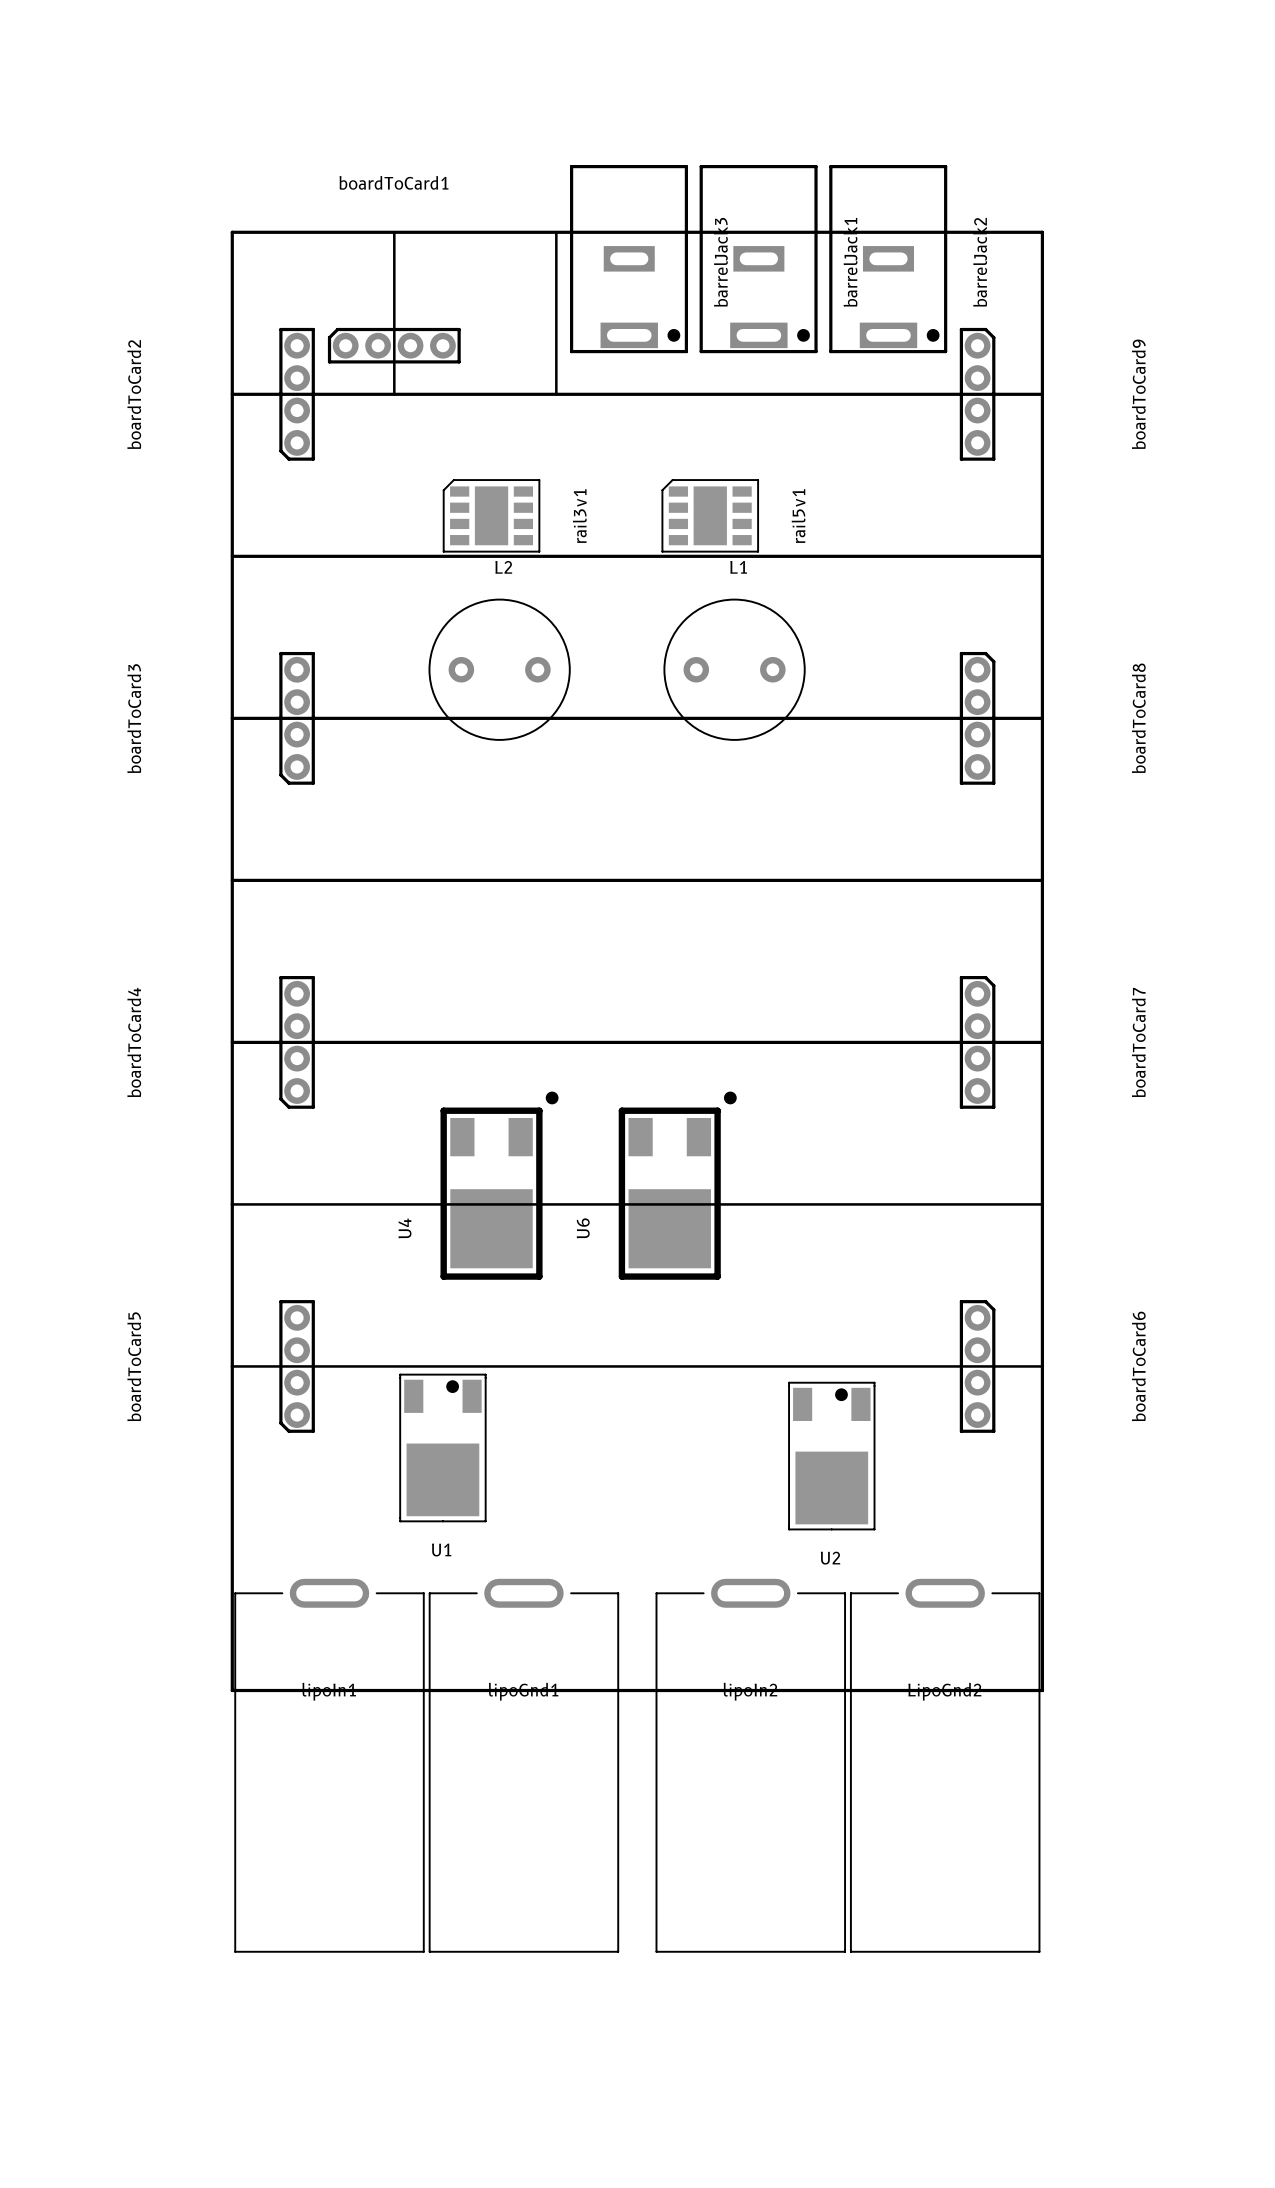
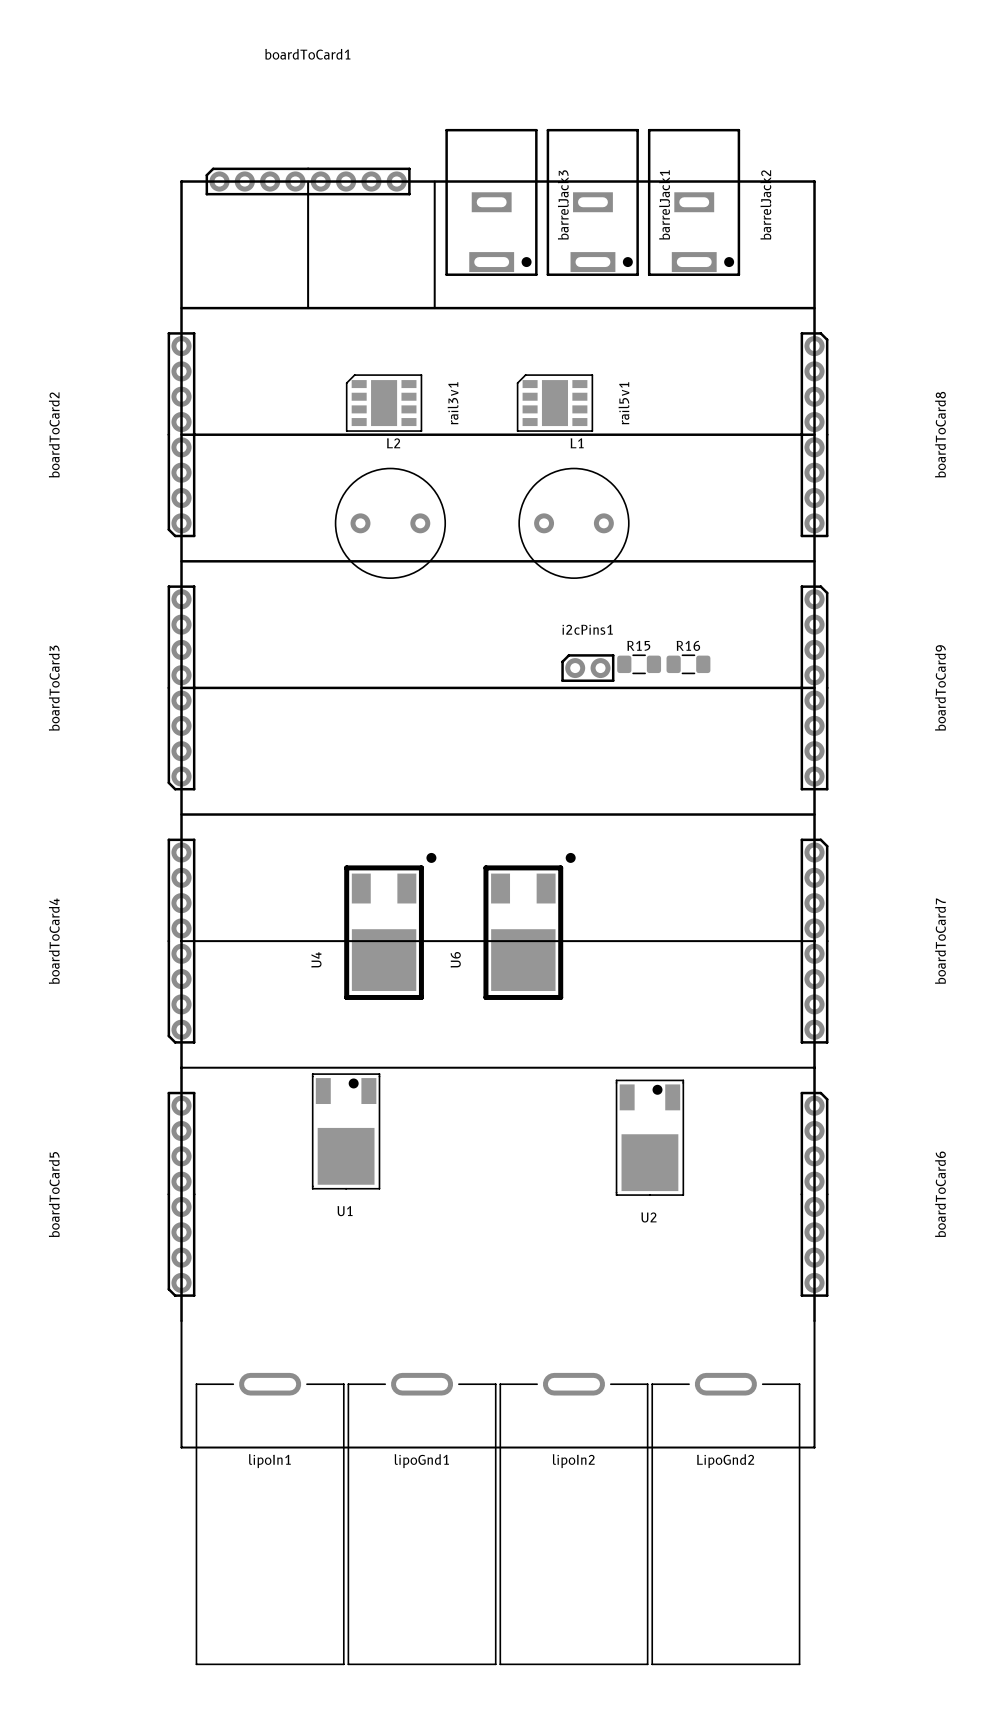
boardToCard2 footprint: [279, 327, 315, 461] -> [167, 332, 196, 538]
boardToCard1 footprint: [327, 327, 461, 364] -> [205, 167, 411, 196]
boardToCard9 footprint: [959, 327, 996, 461] -> [800, 585, 829, 791]
boardToCard3 footprint: [279, 651, 315, 785] -> [167, 585, 196, 791]
boardToCard8 footprint: [959, 651, 996, 785] -> [800, 332, 829, 538]
R15: none -> (639, 664)
R16: none -> (688, 664)
i2cPins1: none -> (587, 668)
boardToCard4 footprint: [279, 976, 315, 1109] -> [167, 838, 196, 1044]
boardToCard7 footprint: [959, 976, 996, 1109] -> [800, 838, 829, 1044]
boardToCard5 footprint: [279, 1300, 315, 1433] -> [167, 1091, 196, 1297]
boardToCard6 footprint: [959, 1300, 996, 1433] -> [800, 1091, 829, 1297]
board edge: (232, 1690) (1042, 1690) -> (181, 1320) (181, 1447) (814, 1447) (814, 1320)
lipoIn1 position: (329, 1765) -> (270, 1518)
lipoGnd1 position: (523, 1765) -> (422, 1518)
lipoIn2 position: (750, 1765) -> (573, 1518)
LipoGnd2 position: (945, 1765) -> (725, 1518)

